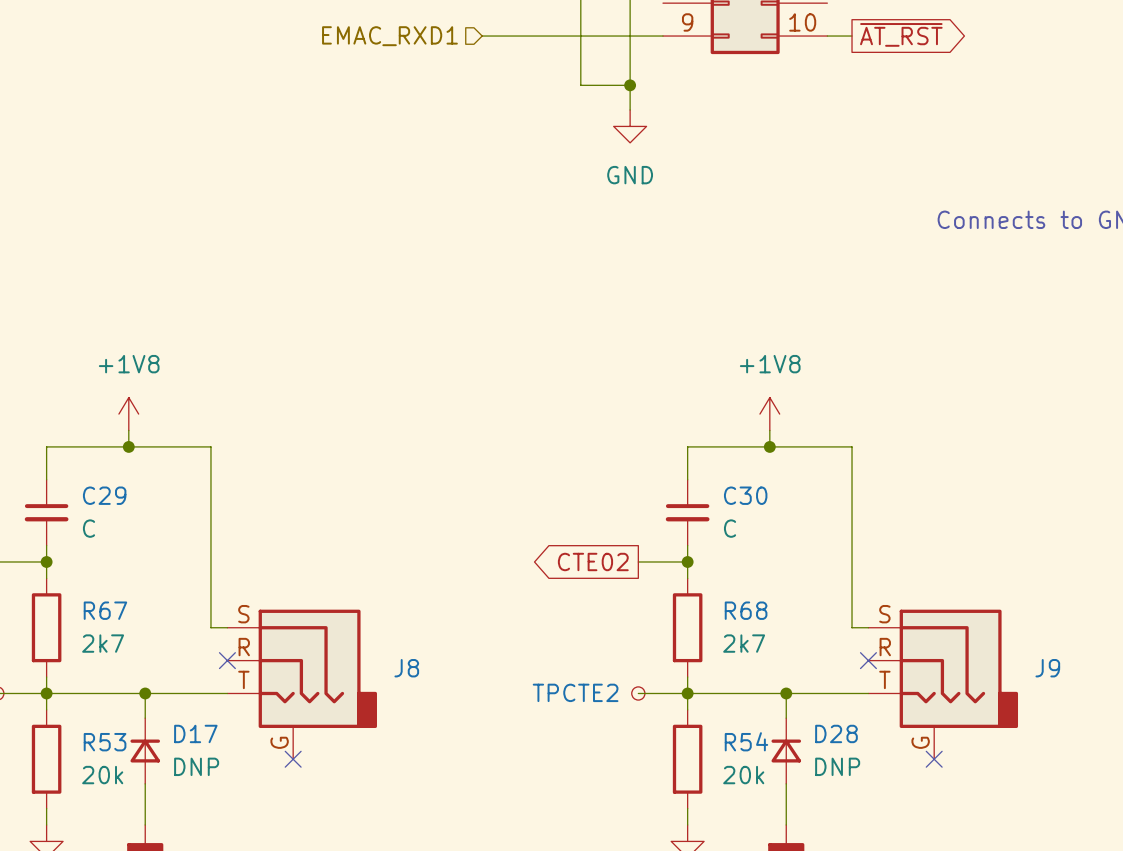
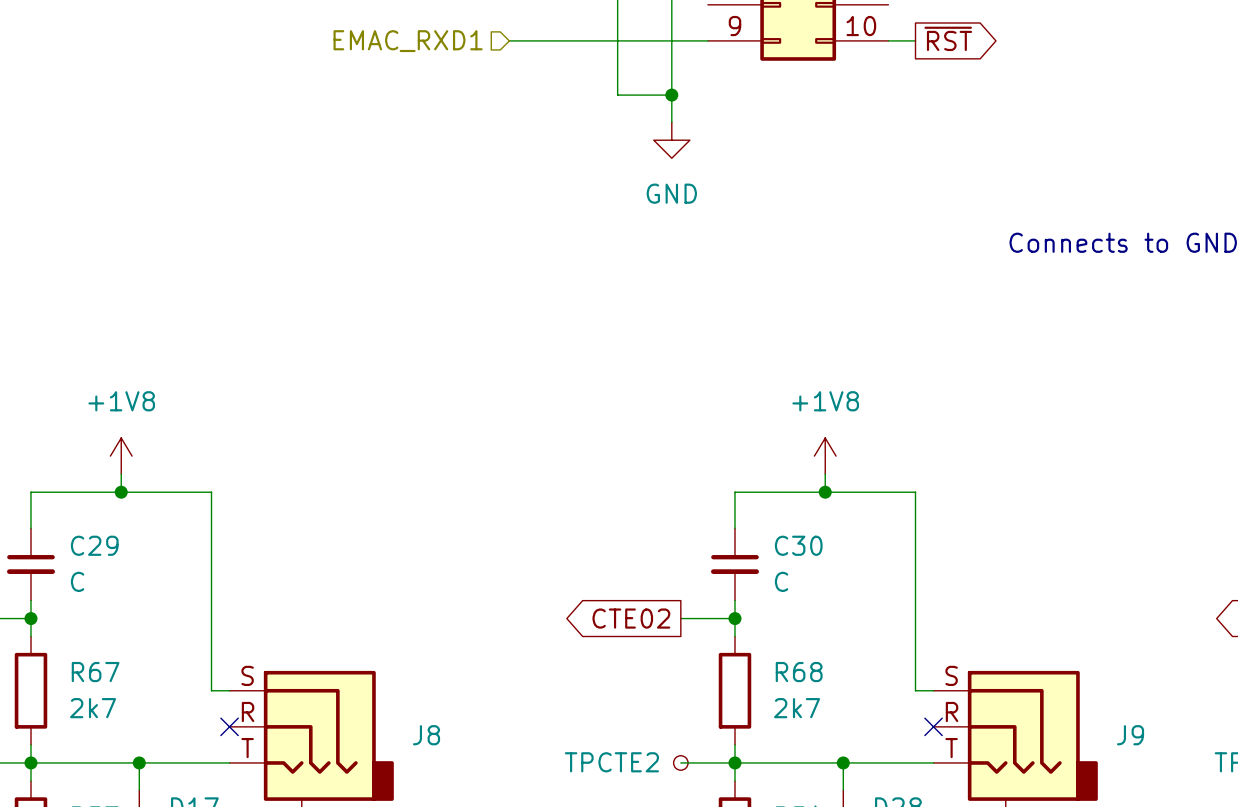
global label: ~{AT_RST} (901, 34) -> ~{RST} (948, 38)

